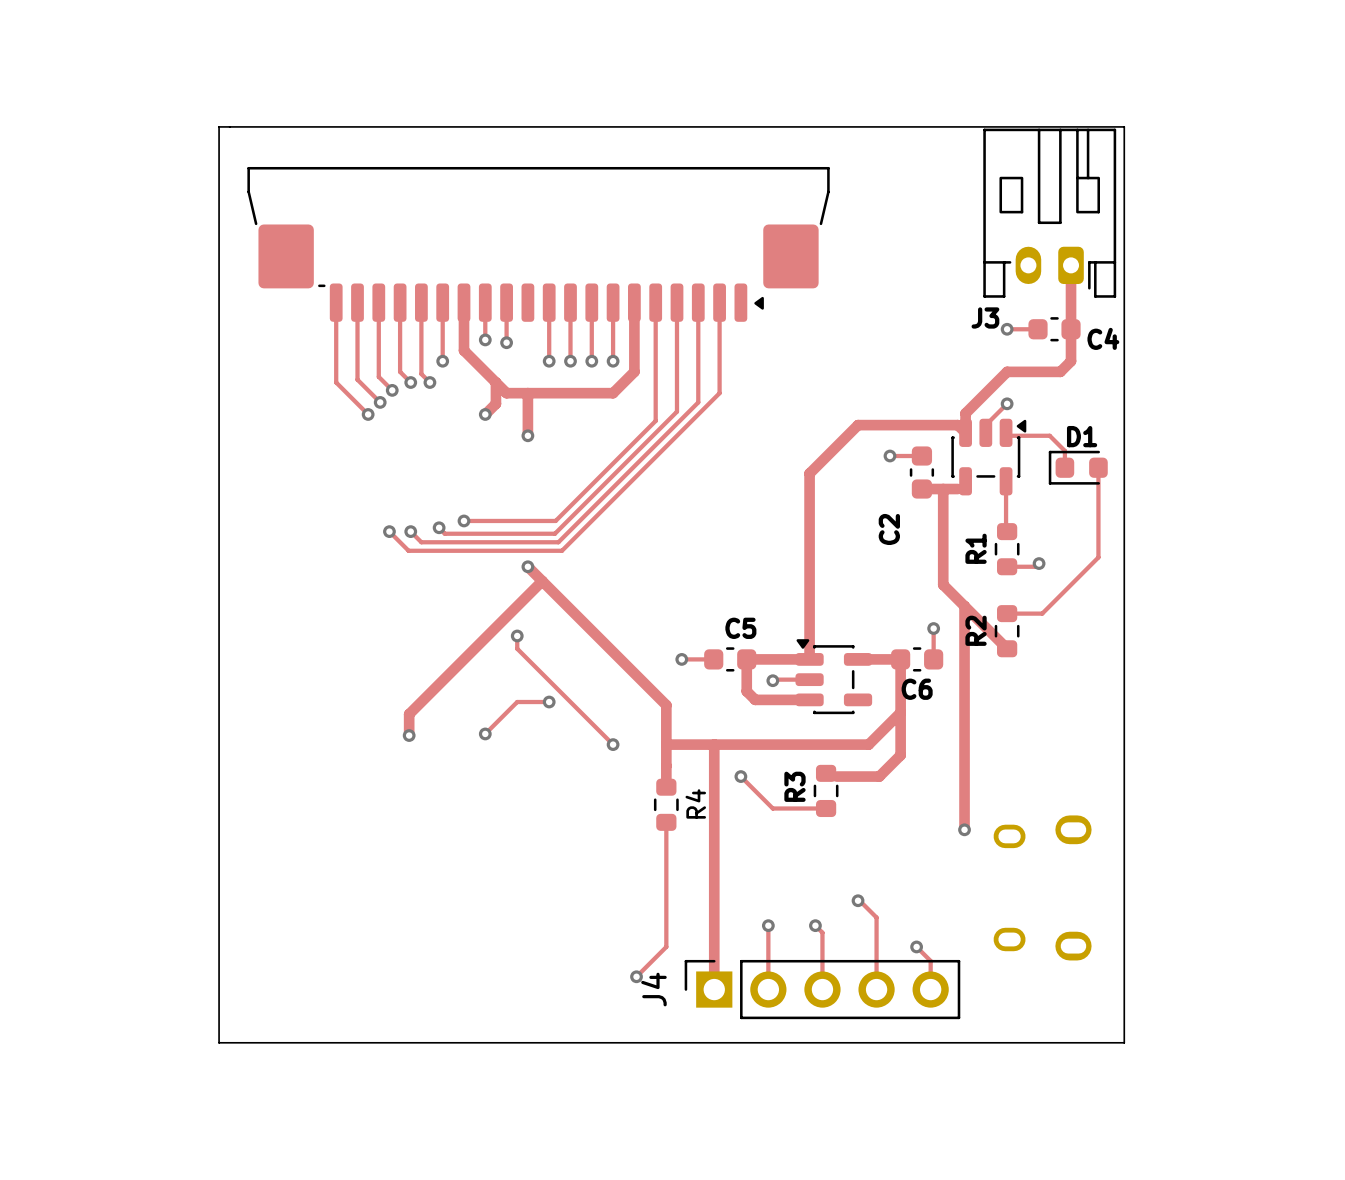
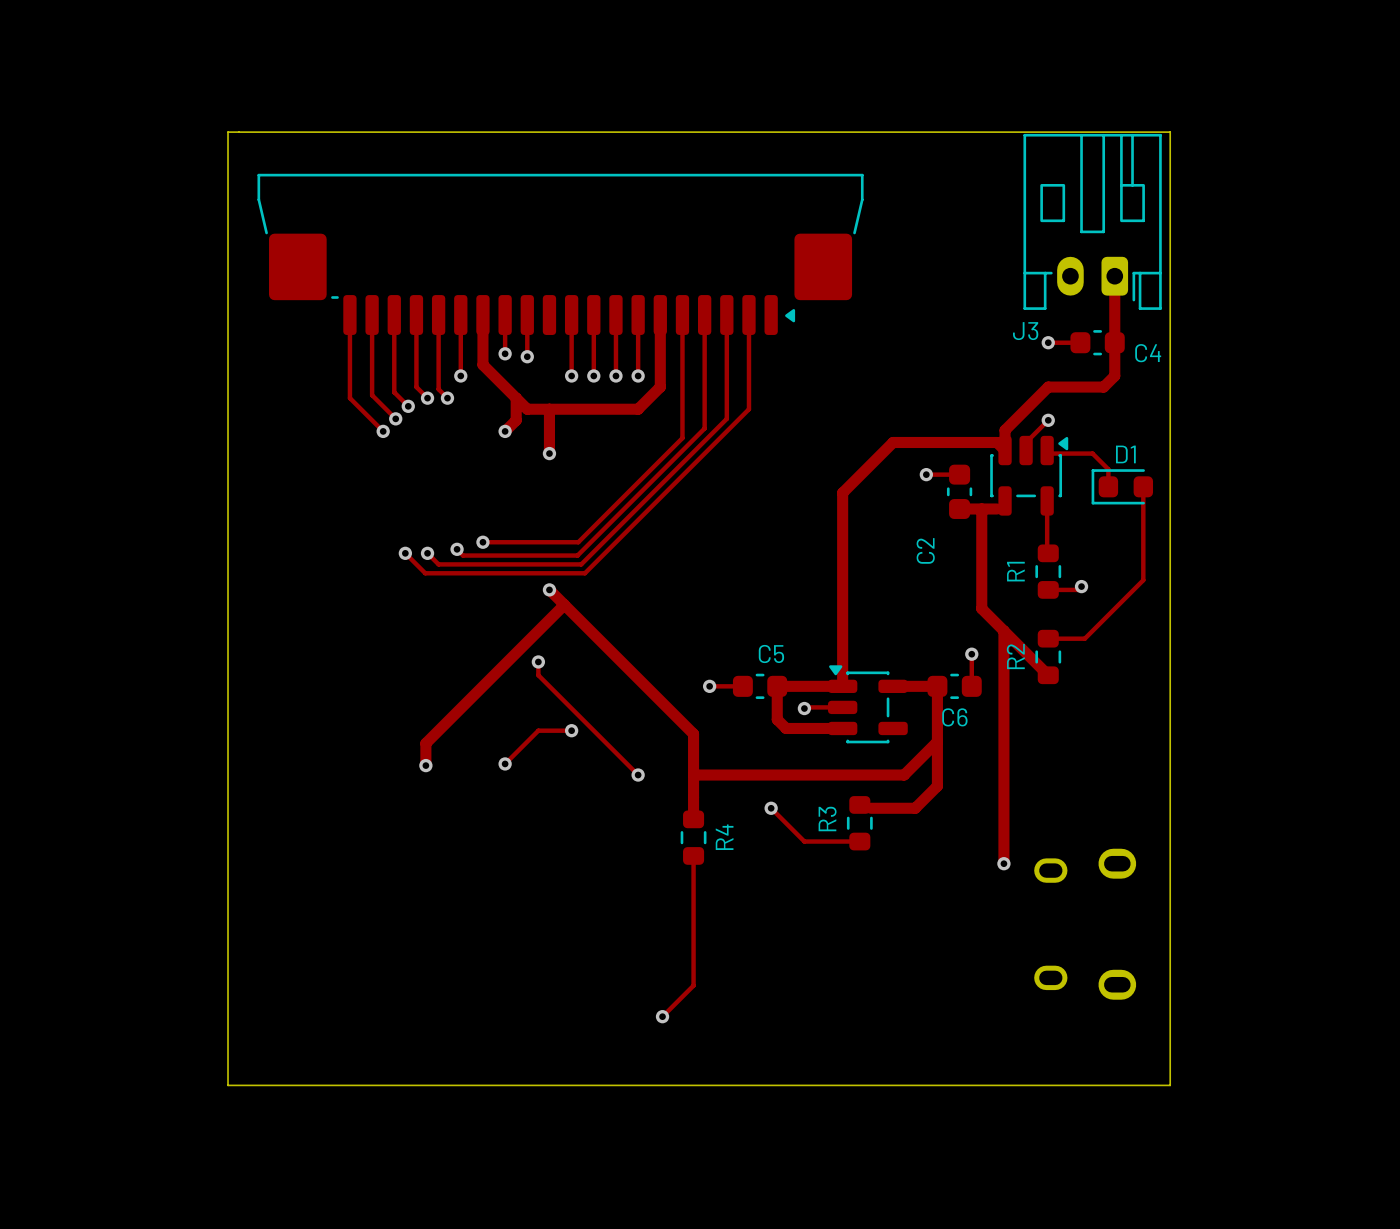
track: (714, 744) (714, 989) -> none
track: (858, 900) (876, 917) (876, 989) -> none
via: (858, 900) -> none
track: (768, 925) (768, 989) -> none
via: (768, 925) -> none
track: (815, 925) (822, 932) (822, 989) -> none
via: (815, 925) -> none
track: (916, 946) (930, 961) (930, 989) -> none
via: (916, 946) -> none
J4: (822, 989) -> none

